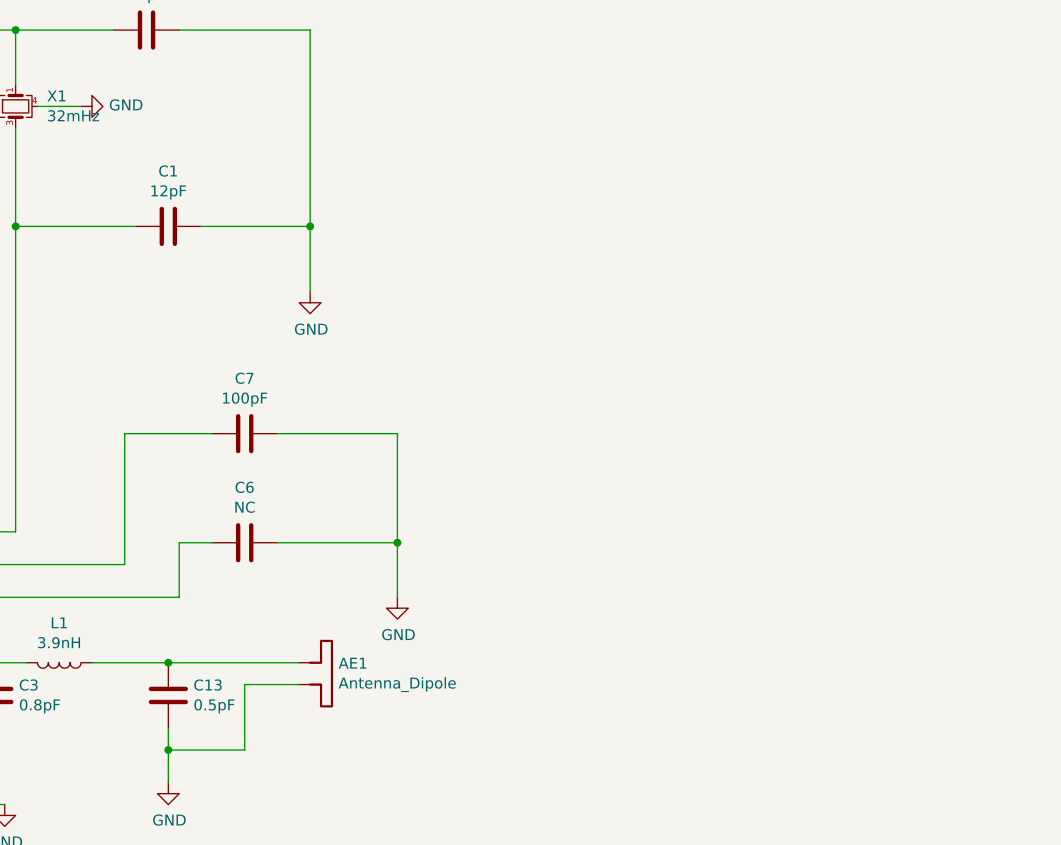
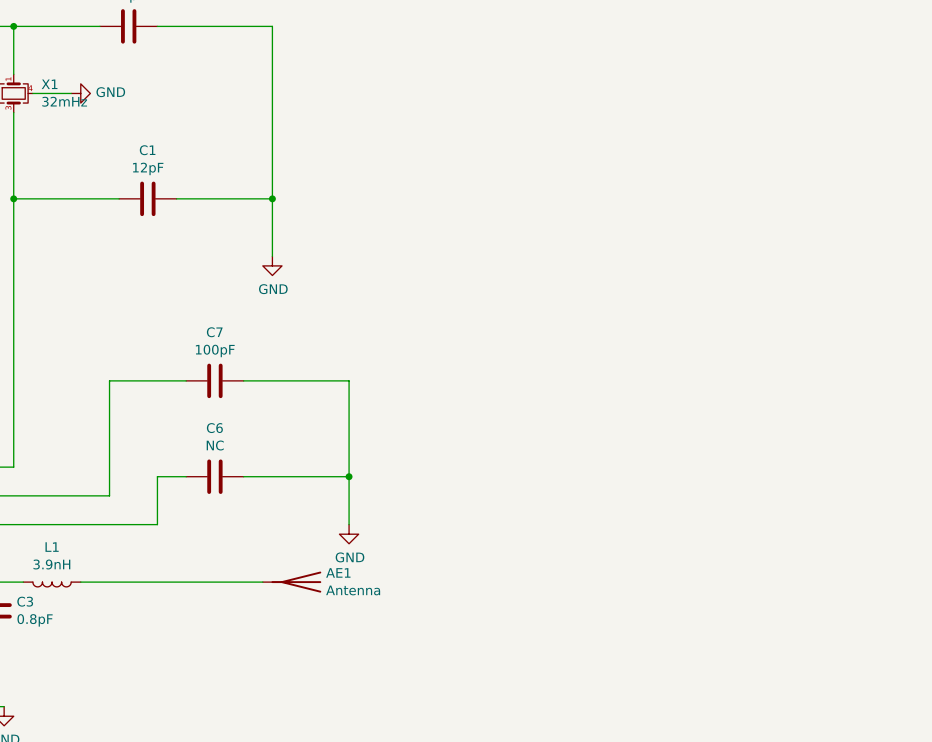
AE1 symbol: [299, 639, 334, 708] -> [262, 571, 322, 593]
junction: (168, 662) -> none
wire: (299, 684) (244, 684) (244, 750) (168, 750) -> none
AE1 value: Antenna_Dipole (397, 684) -> Antenna (353, 590)
C13: 0.5pF (168, 695) -> none
wire: (168, 728) (168, 782) -> none
junction: (168, 750) -> none
power symbol: GND (168, 793) -> none

